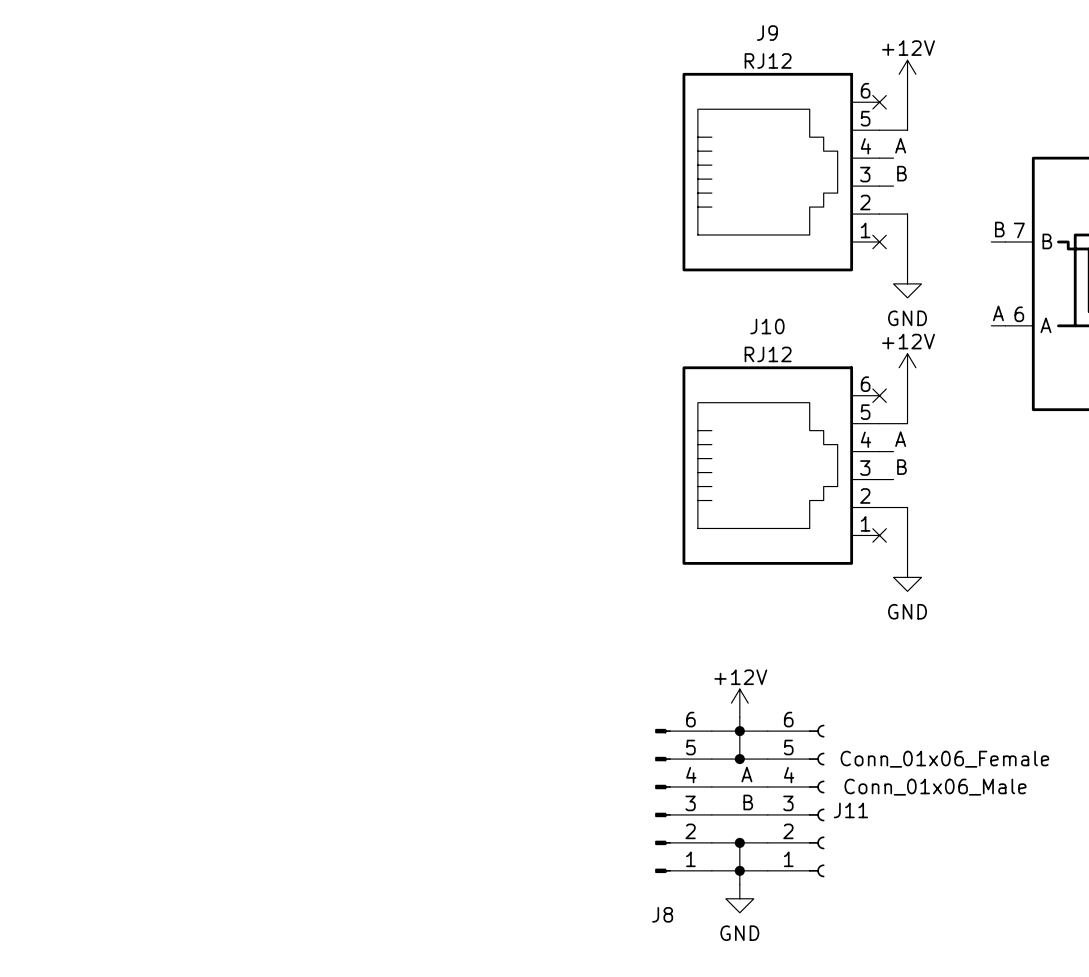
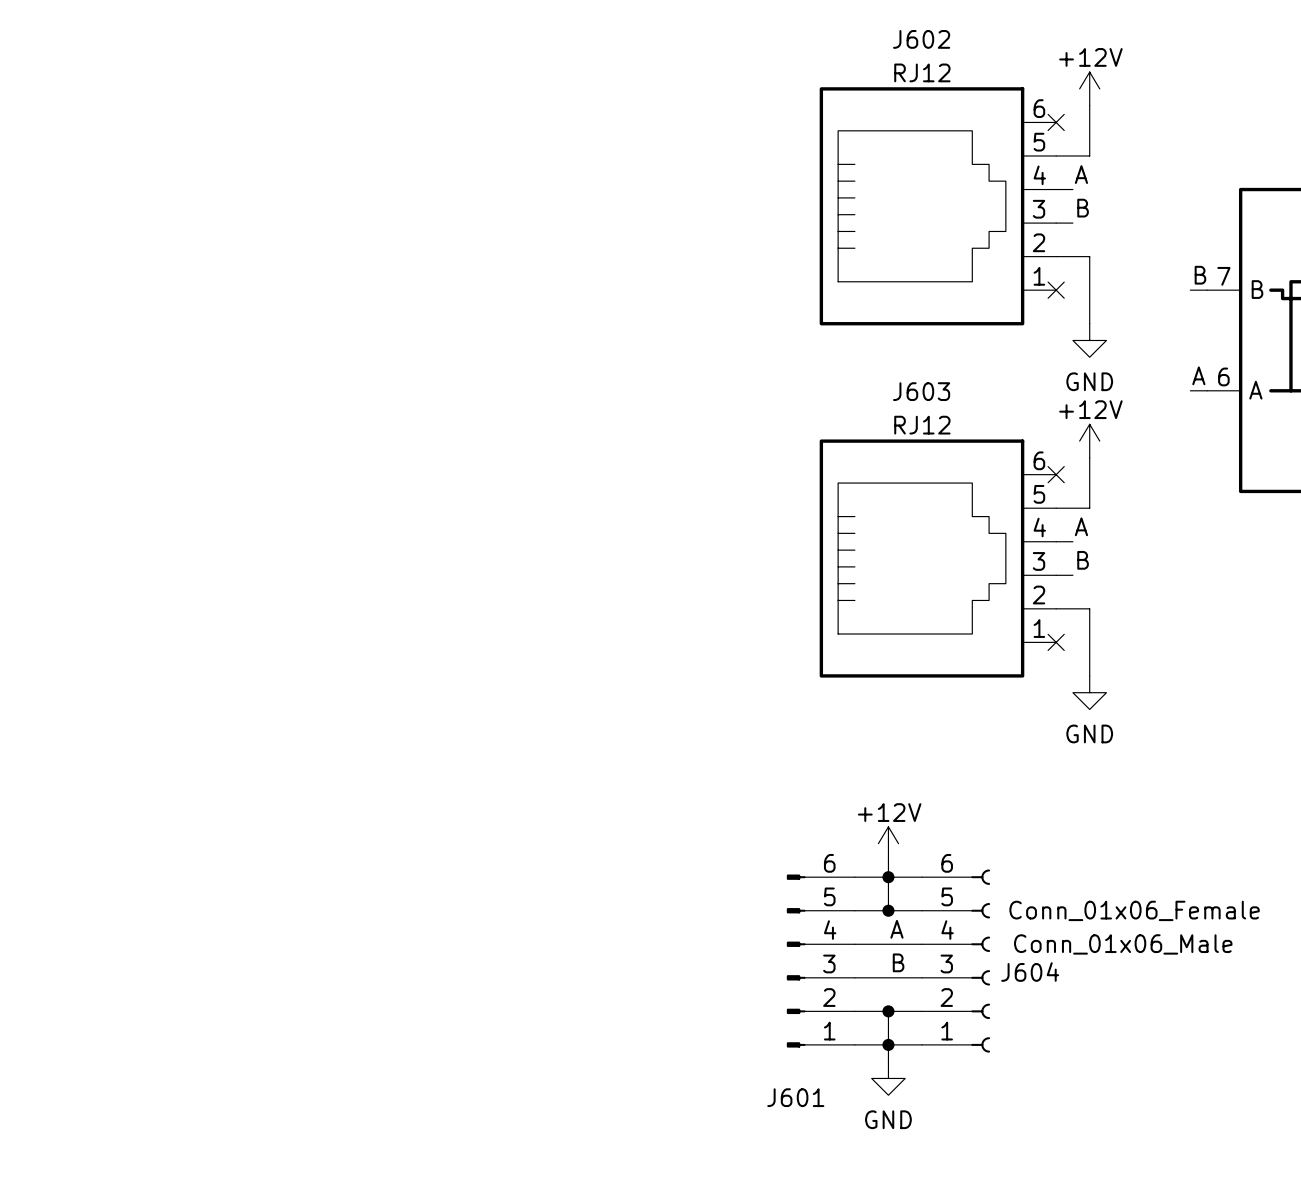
J9 name: J9 (767, 33) -> J602 (921, 39)
J10 name: J10 (767, 326) -> J603 (921, 391)
J11 name: J11 (850, 810) -> J604 (1030, 972)
J8 name: J8 (662, 914) -> J601 (795, 1097)

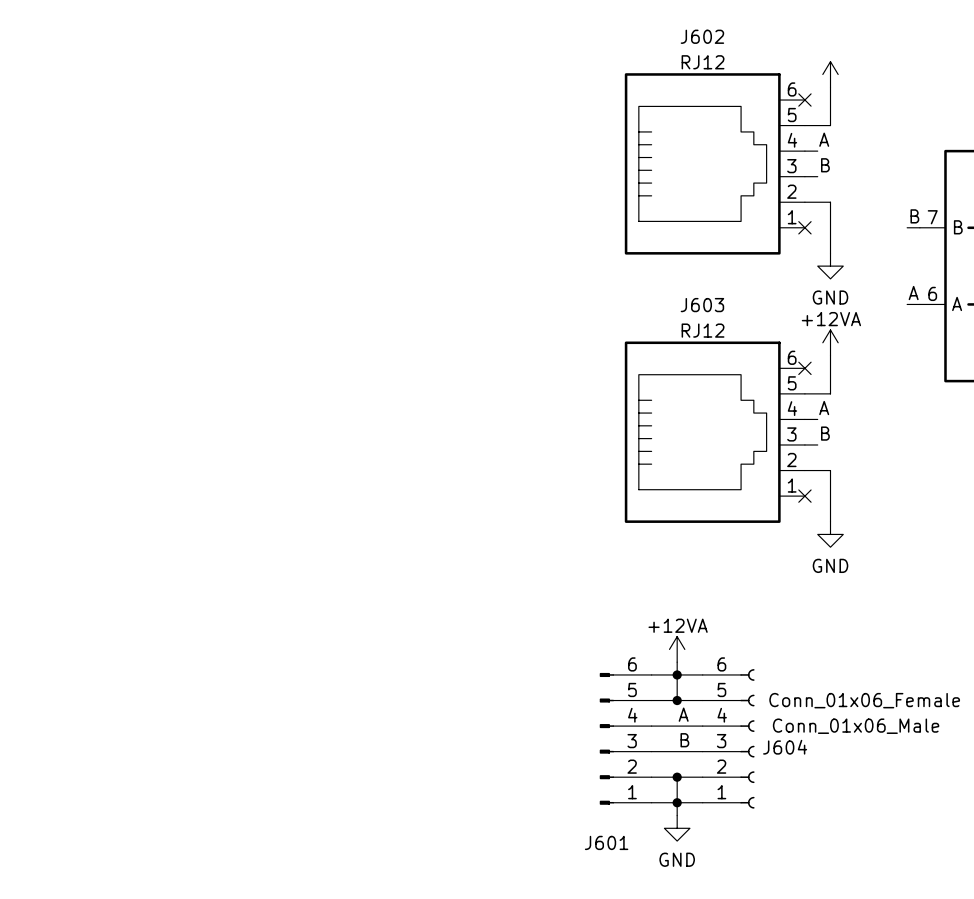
power symbol text: +12V (1090, 57) -> none
power symbol: +12V (1089, 441) -> +12VA (830, 342)
power symbol: +12V (888, 843) -> +12VA (677, 649)

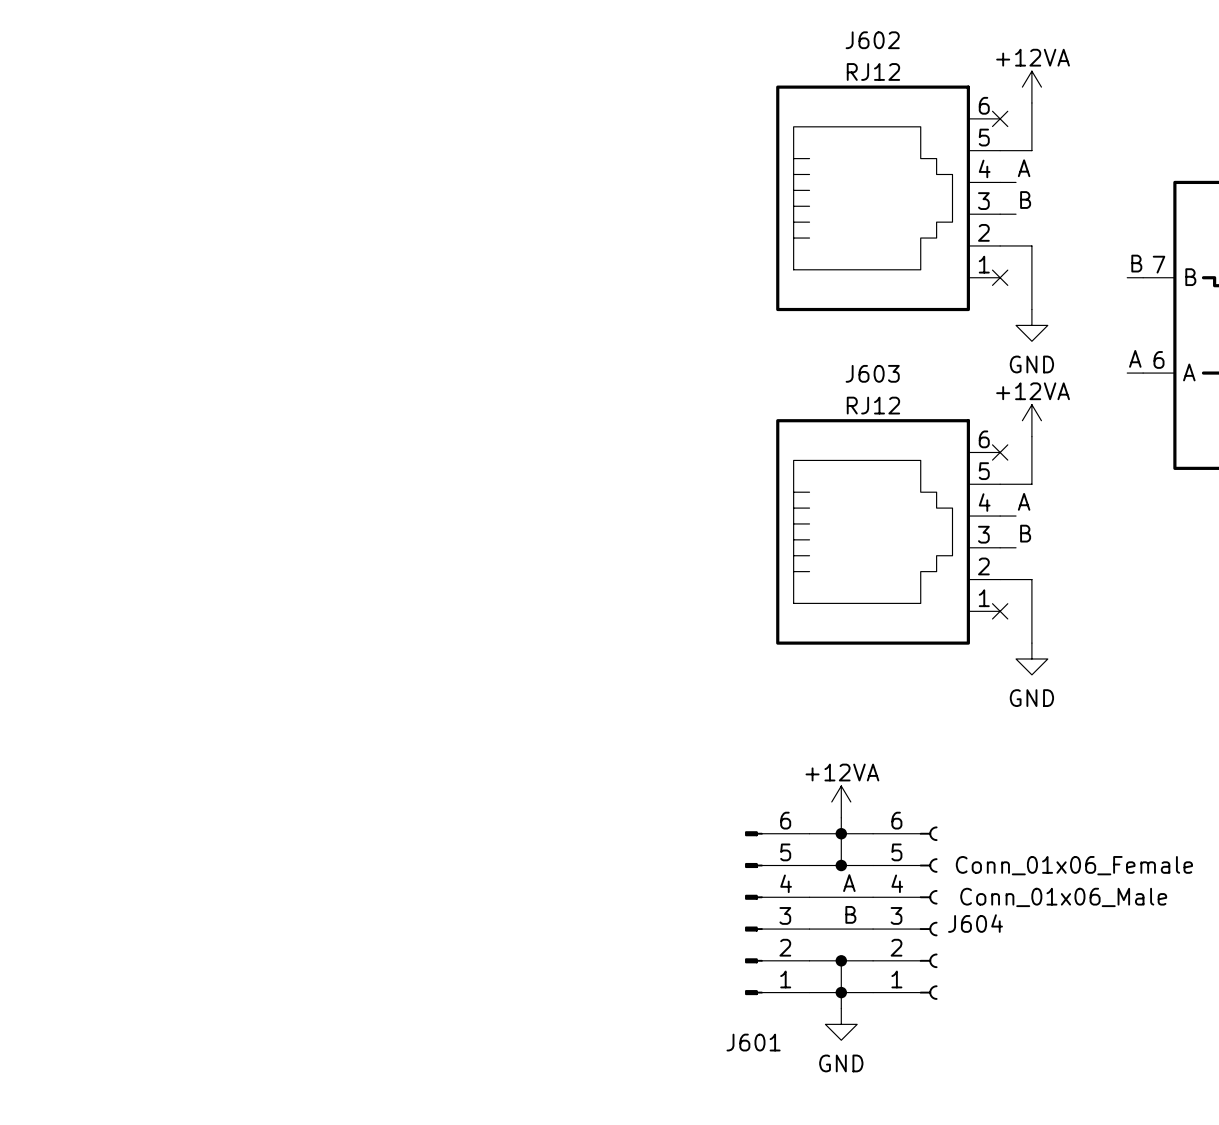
power symbol text: none -> +12VA (1033, 57)

